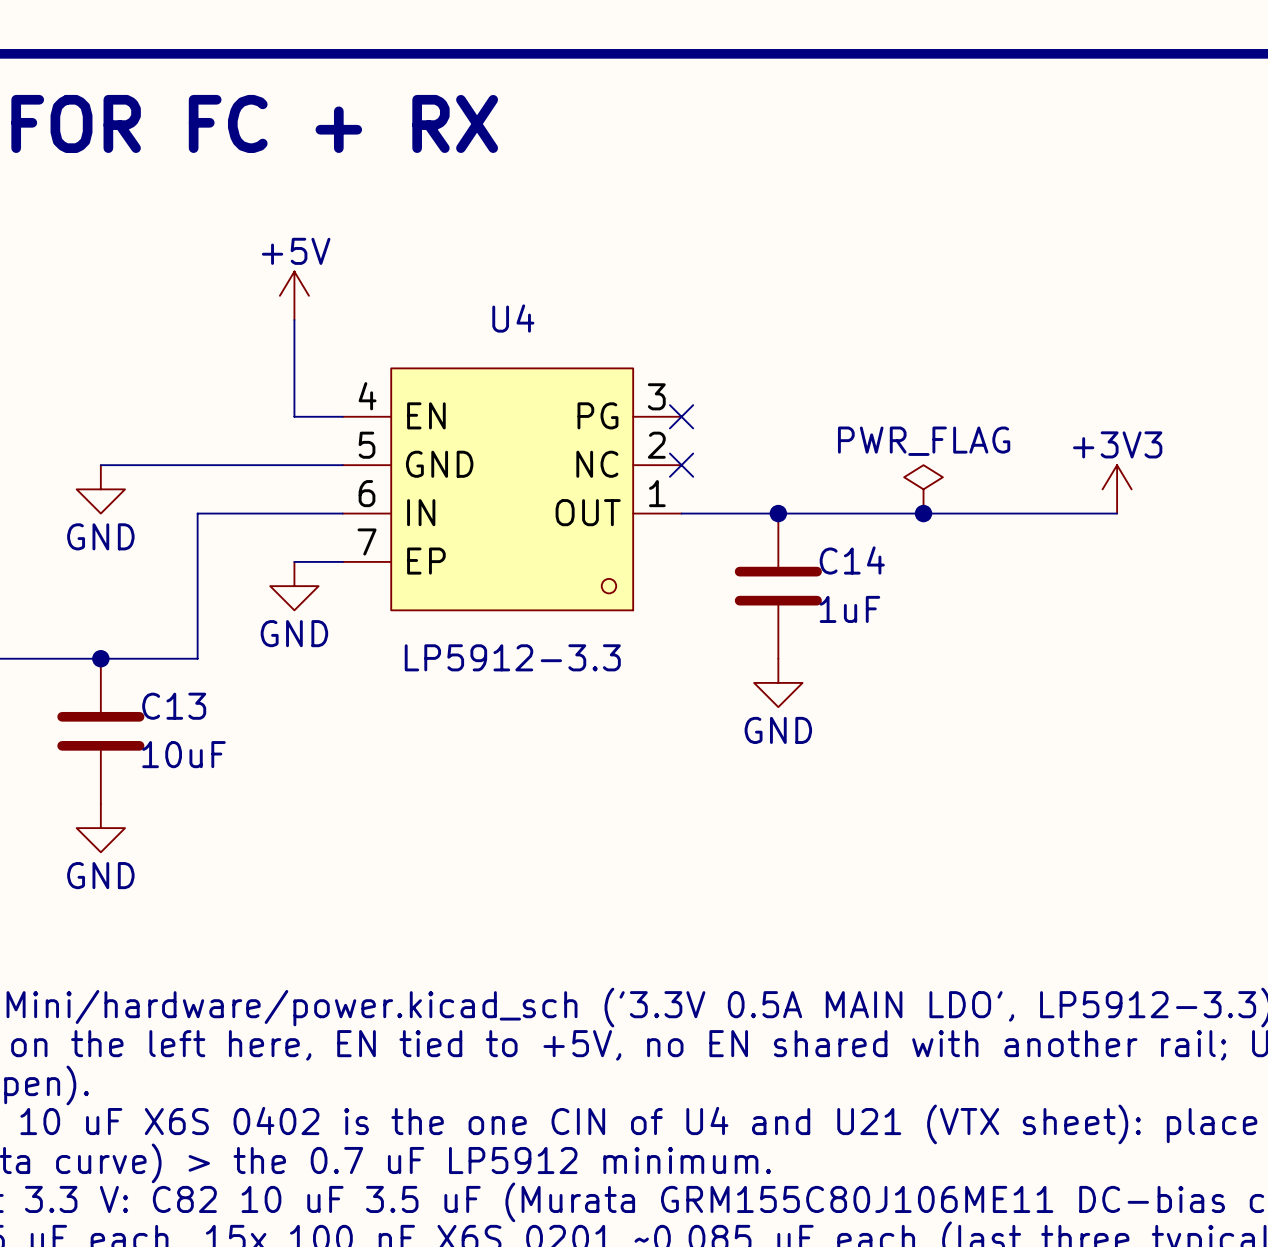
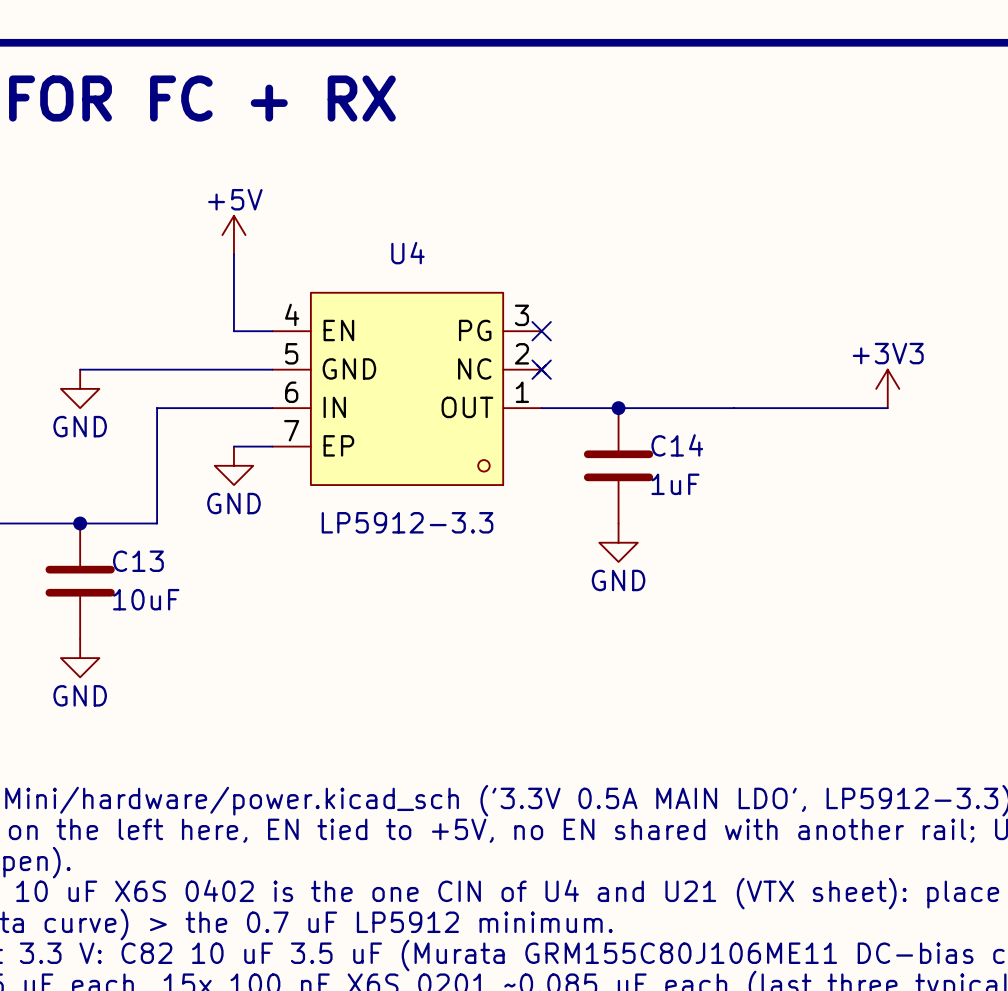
U4 symbol: [342, 368, 682, 611] -> [272, 292, 547, 486]
power symbol: PWR_FLAG (923, 489) -> none
junction: (923, 513) -> none

